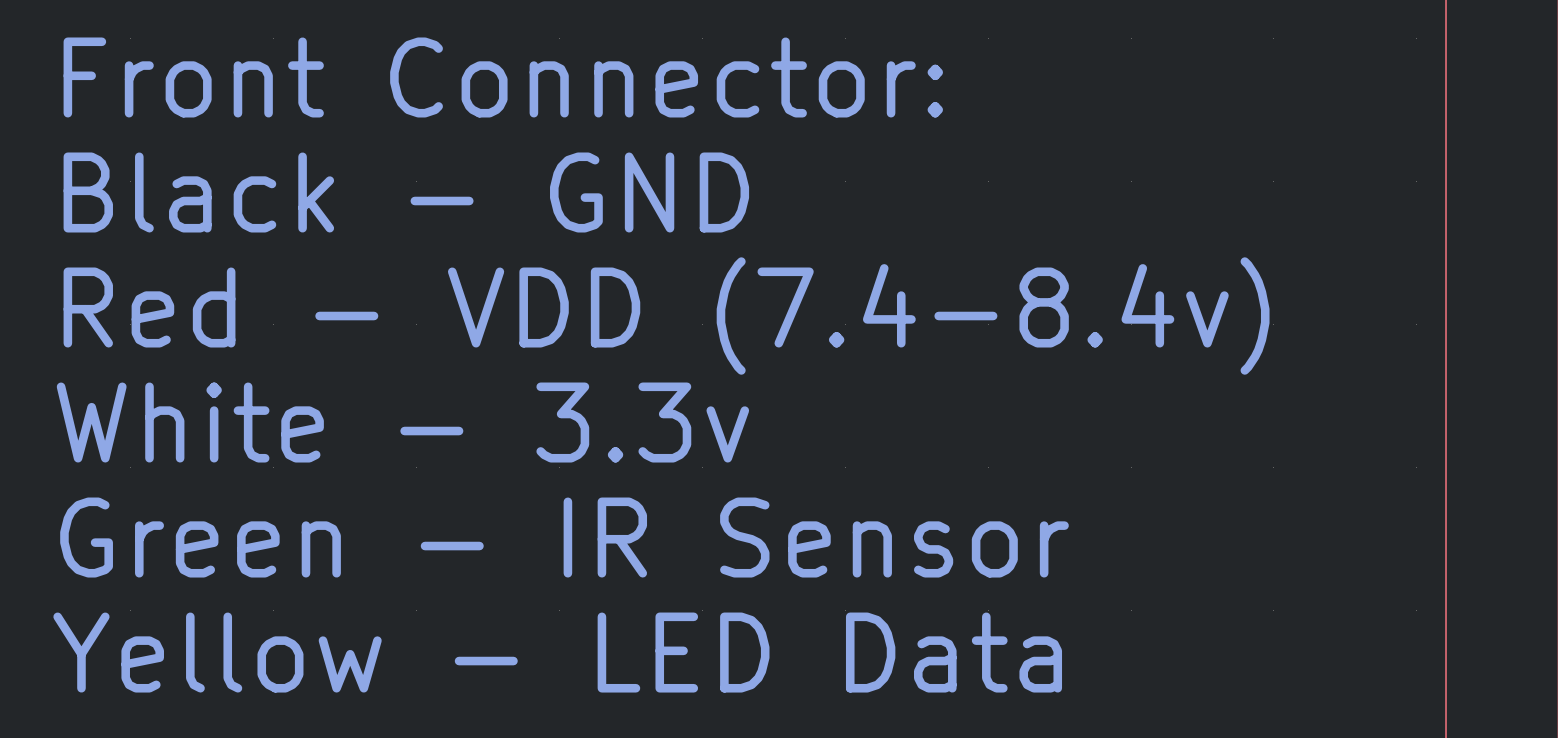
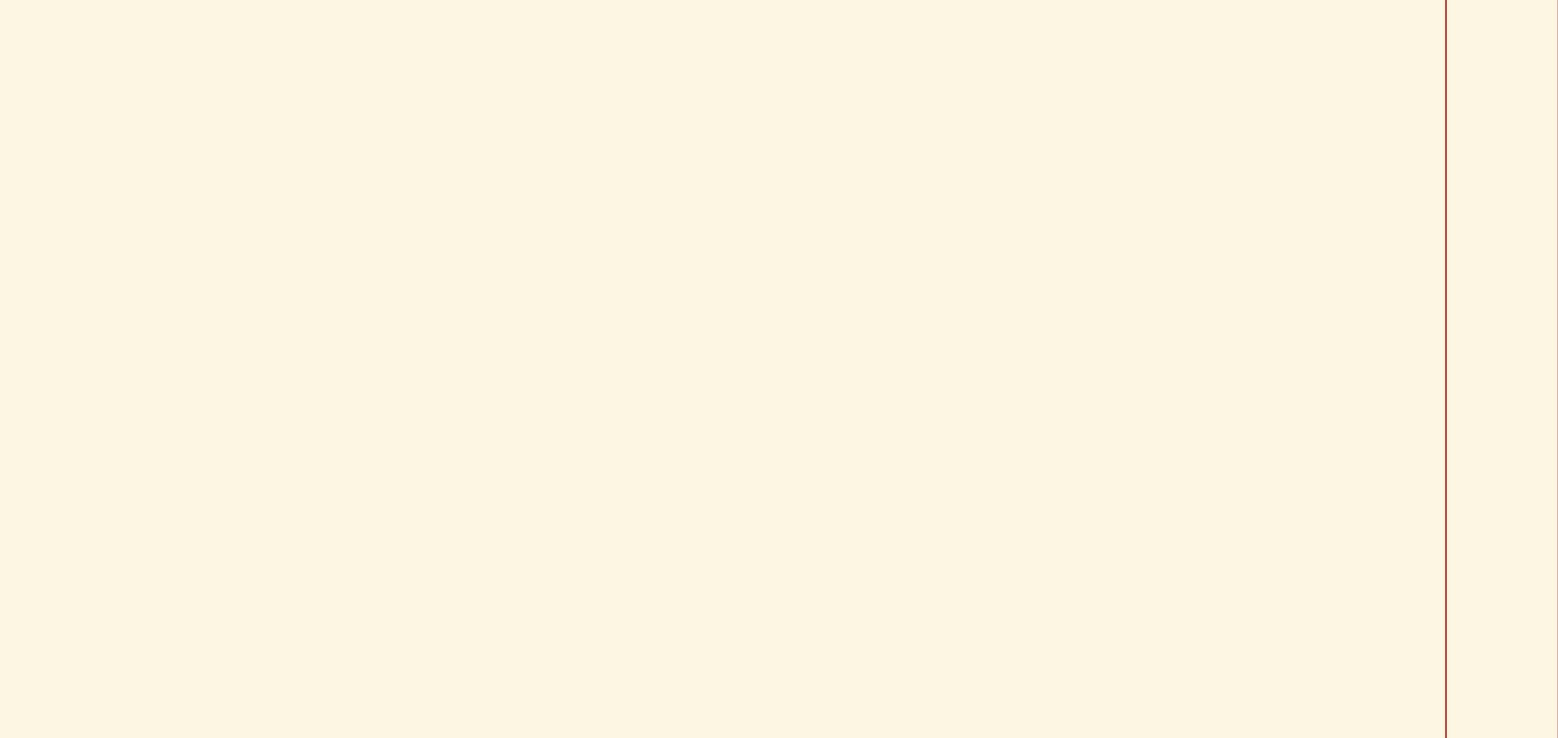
text: Front Connector: (503, 77) -> none
text: Black - GND (406, 192) -> none
text: Red - VDD (7.4-8.4v) (666, 316) -> none
text: White - 3.3v (402, 422) -> none
text: Green - IR Sensor (564, 537) -> none
text: Yellow - LED Data (557, 652) -> none

